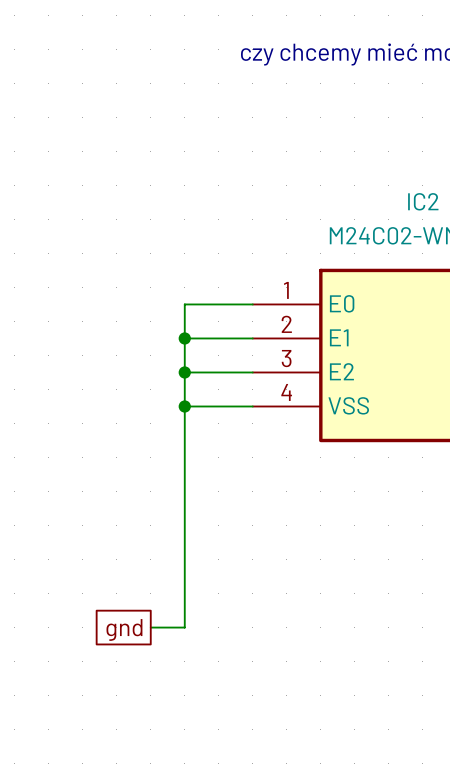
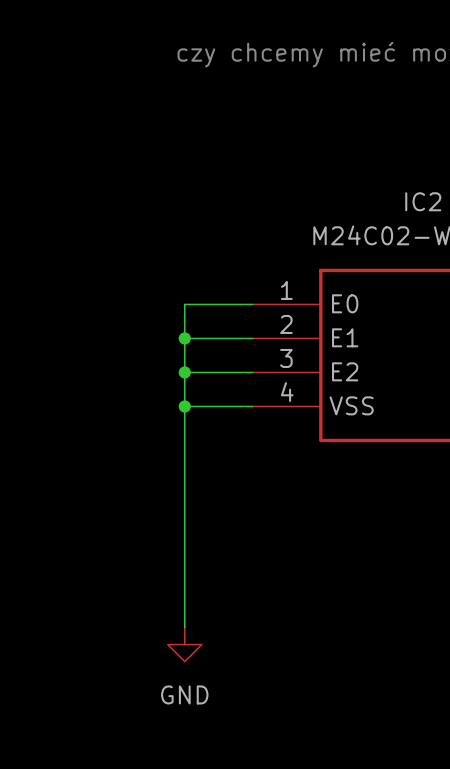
wire: (150, 627) (184, 627) -> none
global label: gnd (124, 629) -> none
power symbol: none -> GND (184, 644)

